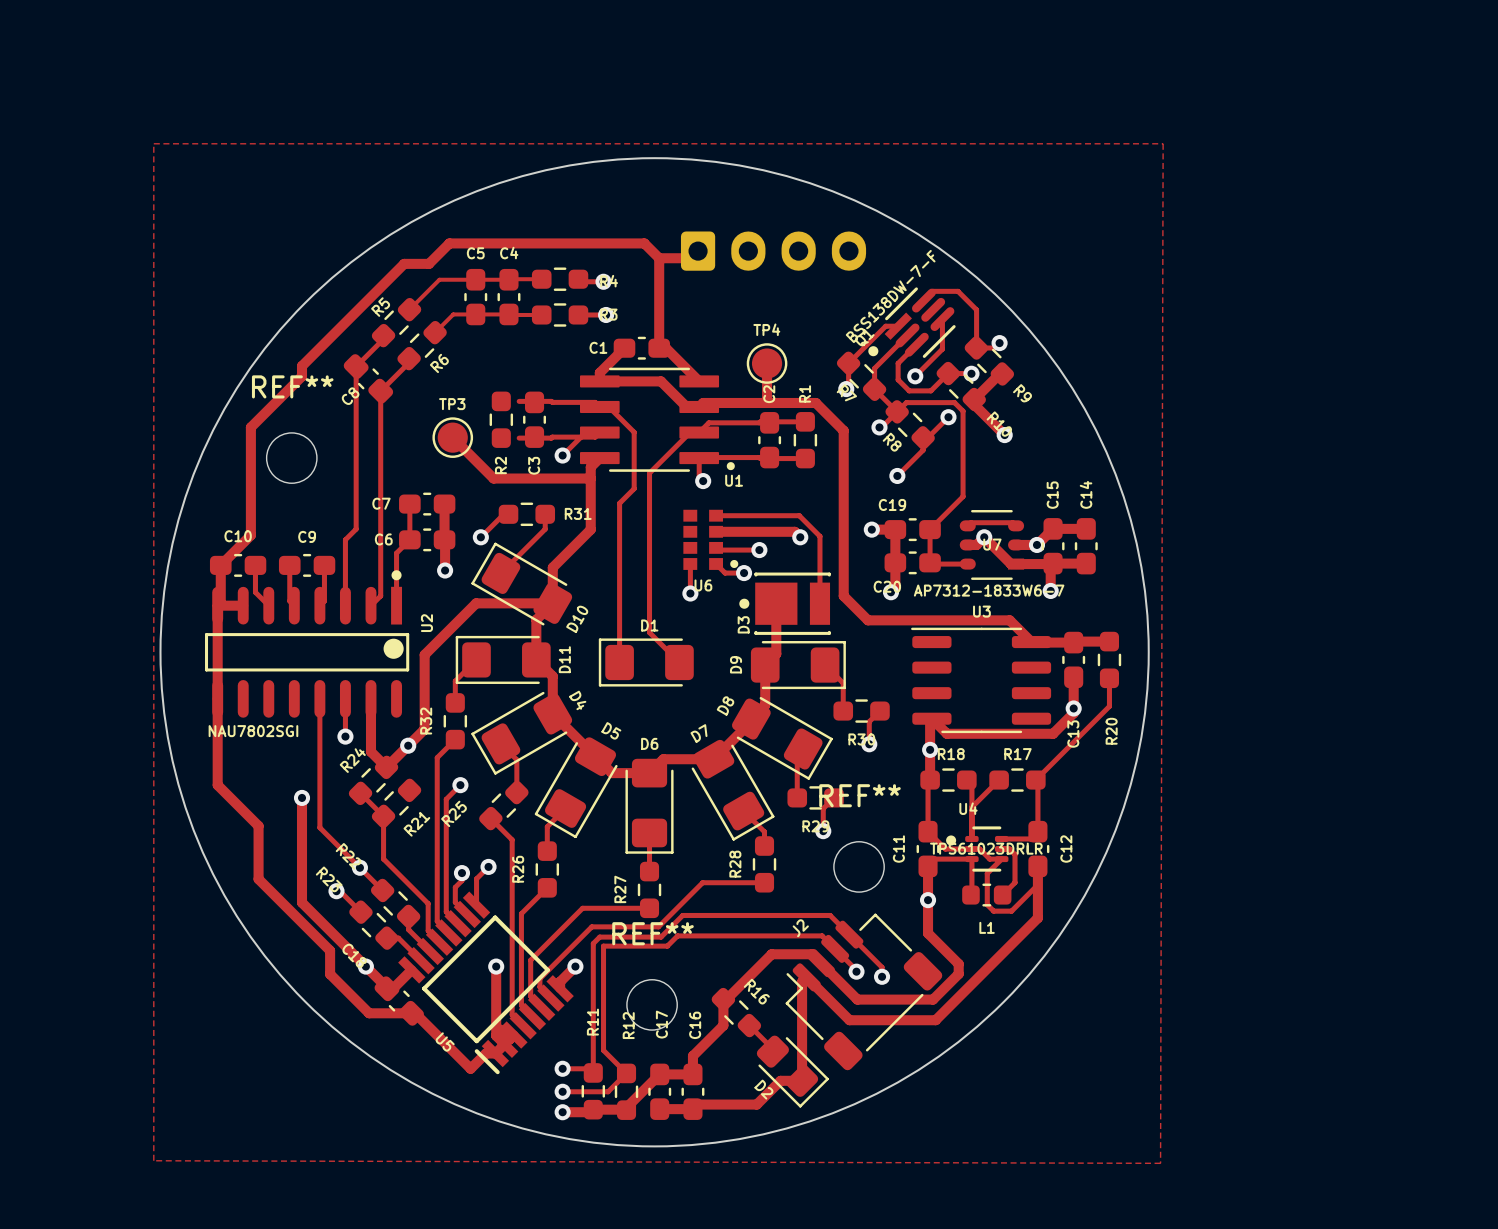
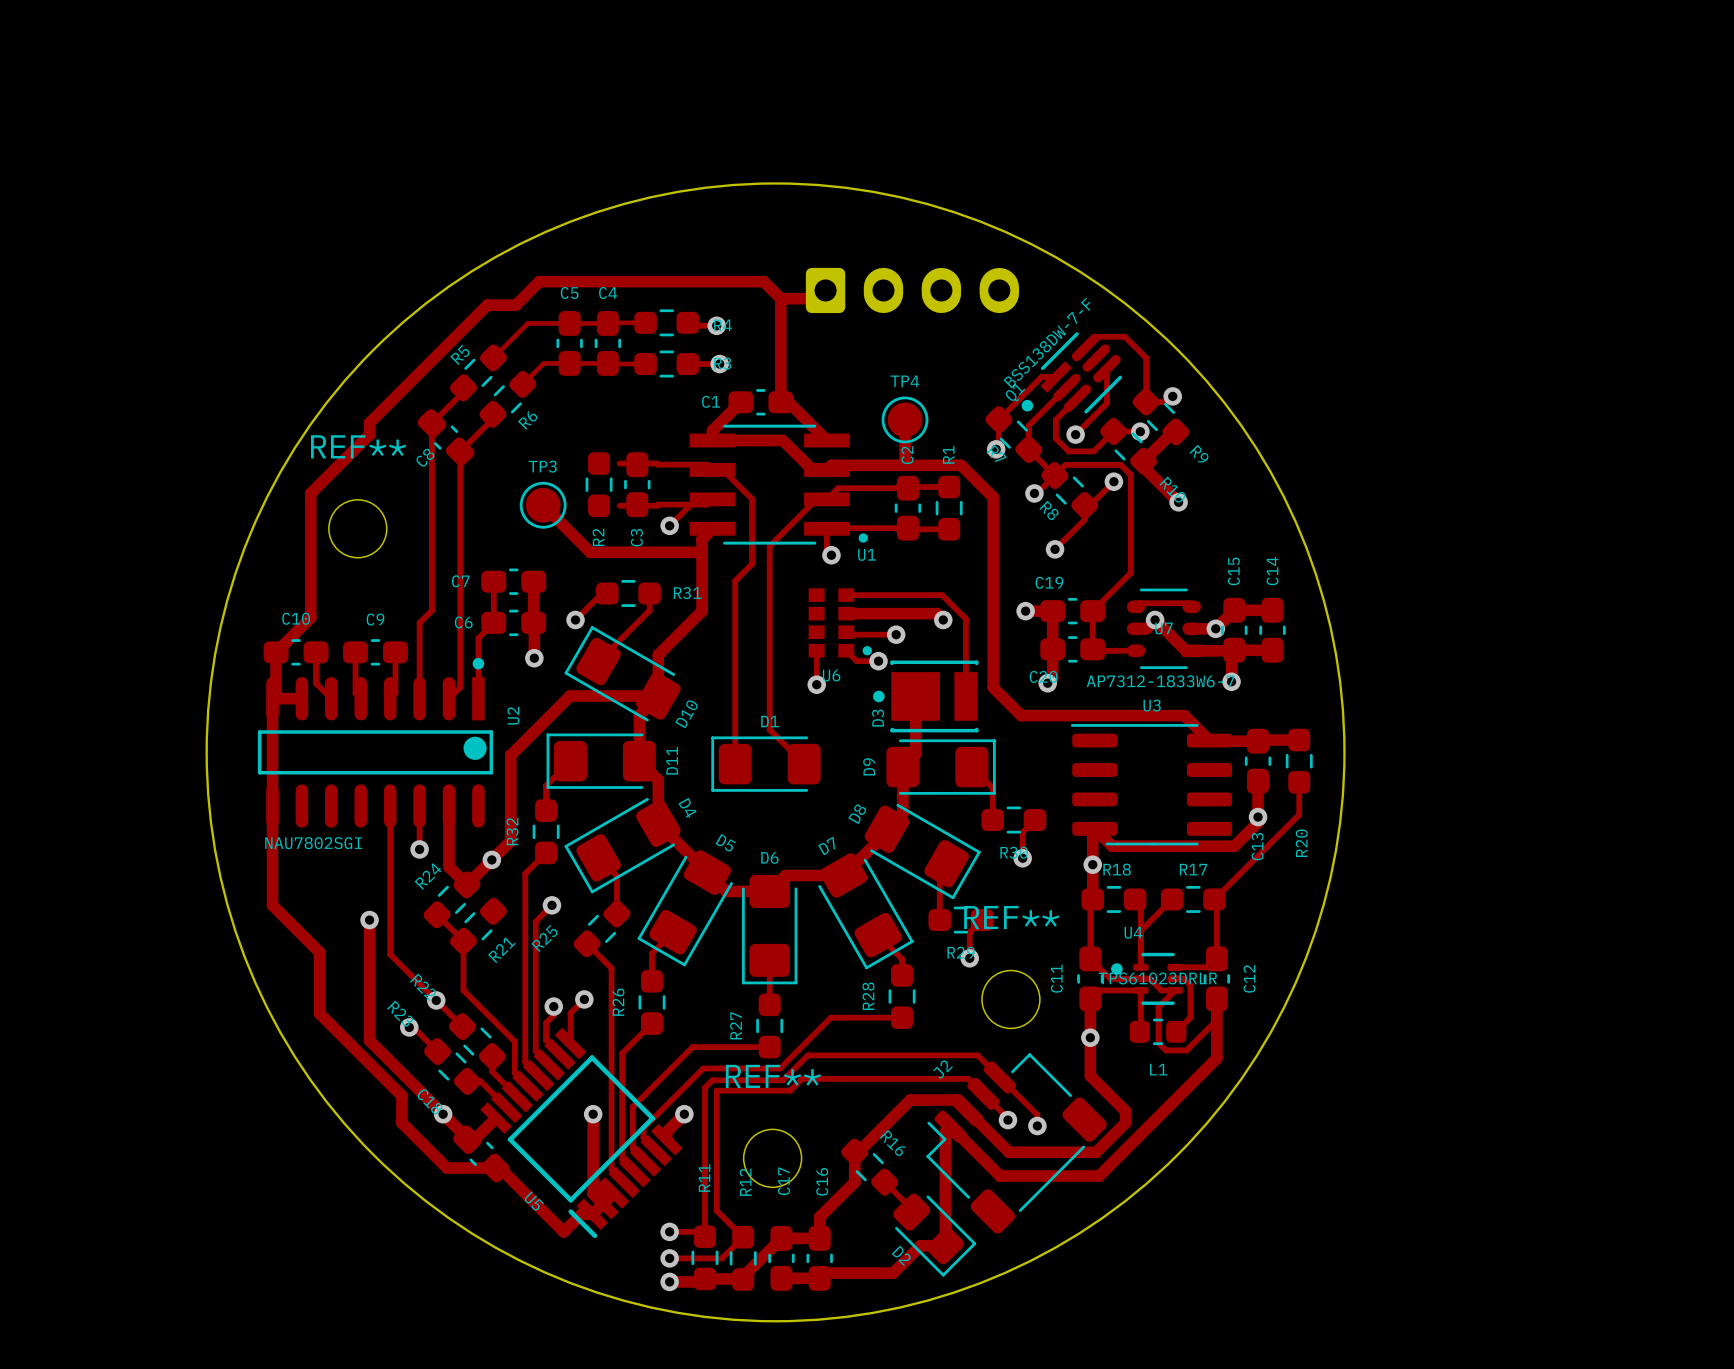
zone outline: (153, 143) (153, 1160) (1160, 1163) (1163, 143) (153, 143) -> none

